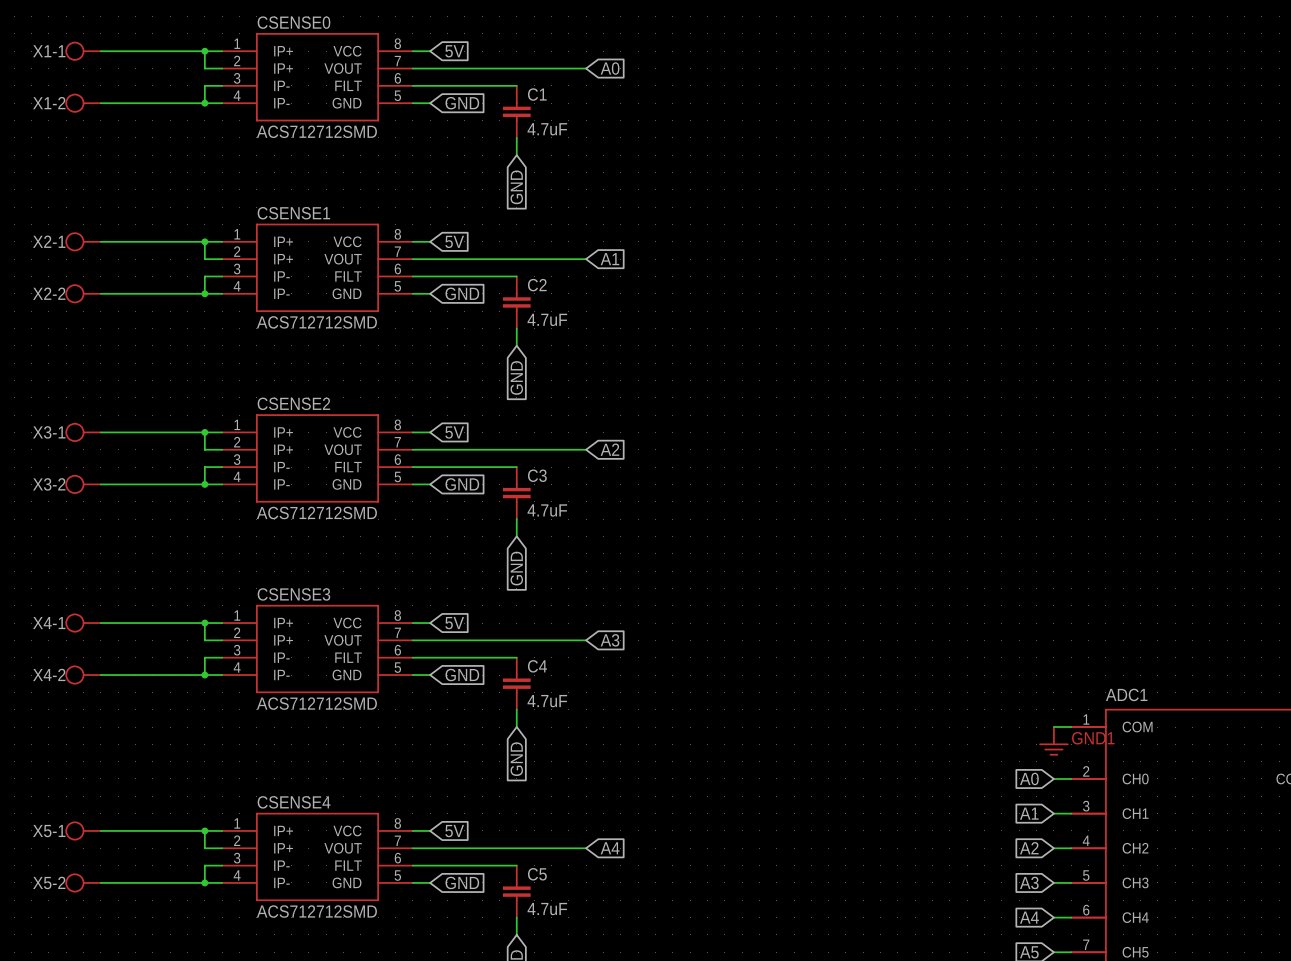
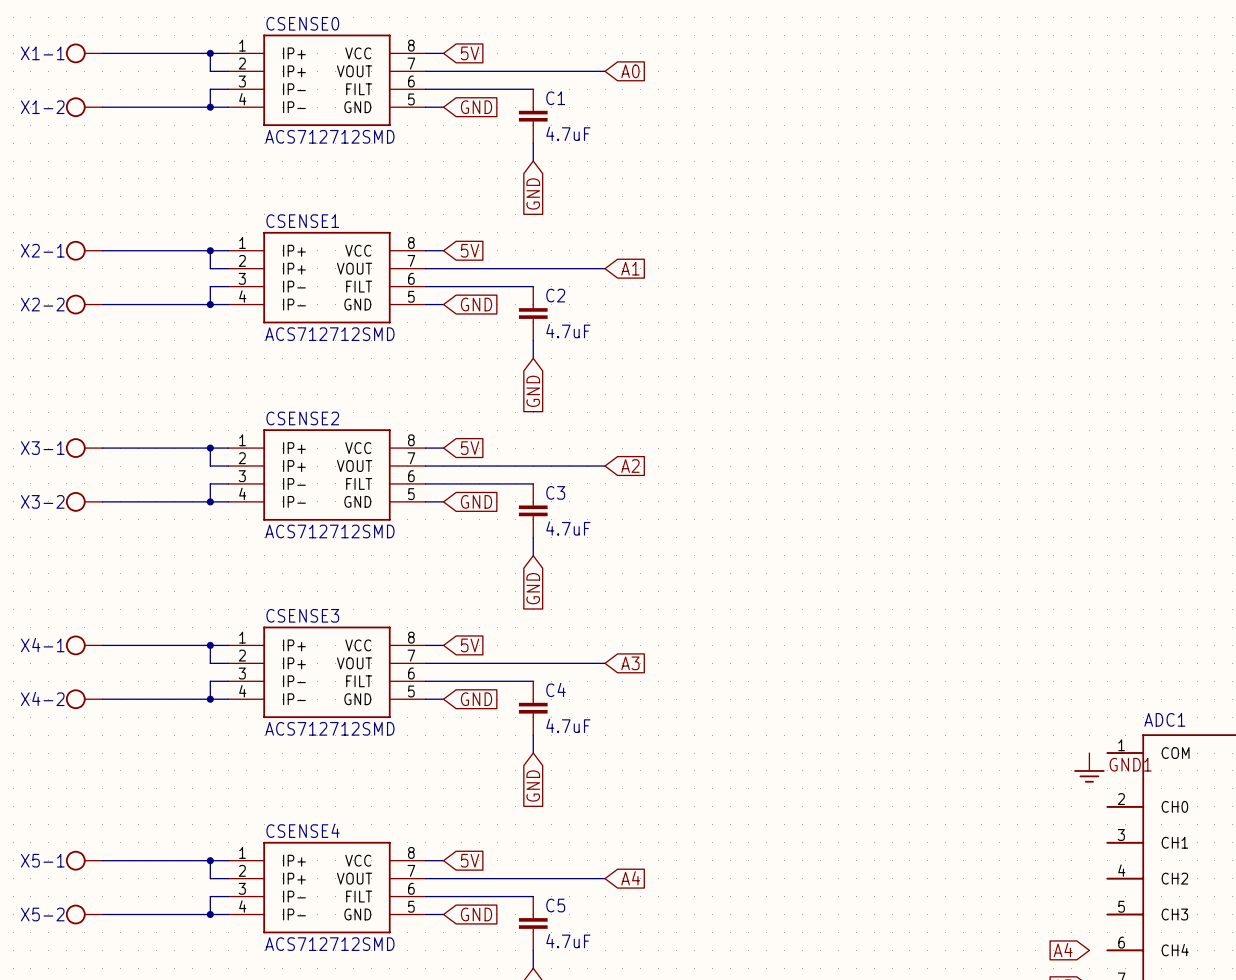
wire: (1053, 727) (1071, 727) -> none
global label: A0 (1029, 778) -> none
wire: (1053, 778) (1071, 778) -> none
global label: A1 (1029, 813) -> none
wire: (1053, 813) (1071, 813) -> none
global label: A2 (1029, 848) -> none
wire: (1053, 848) (1071, 848) -> none
global label: A3 (1029, 882) -> none
wire: (1053, 882) (1071, 882) -> none
wire: (1053, 917) (1071, 917) -> none

